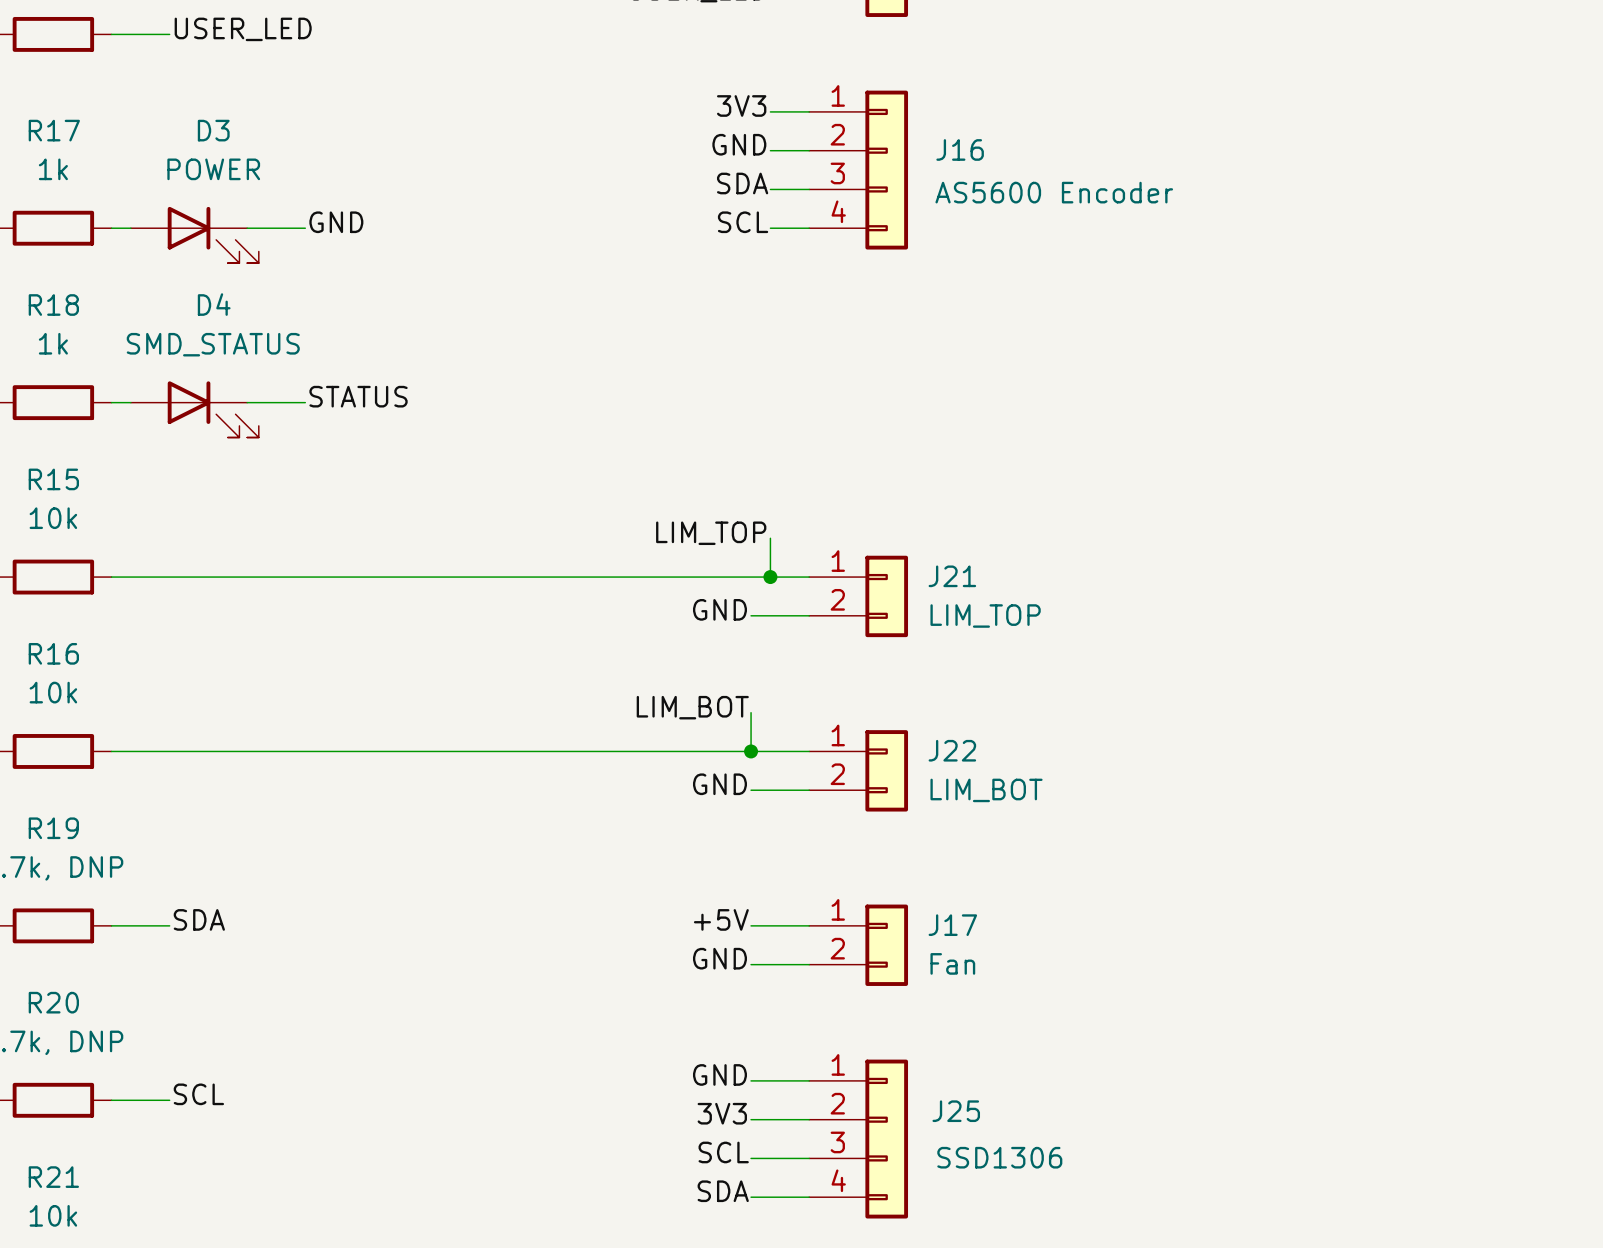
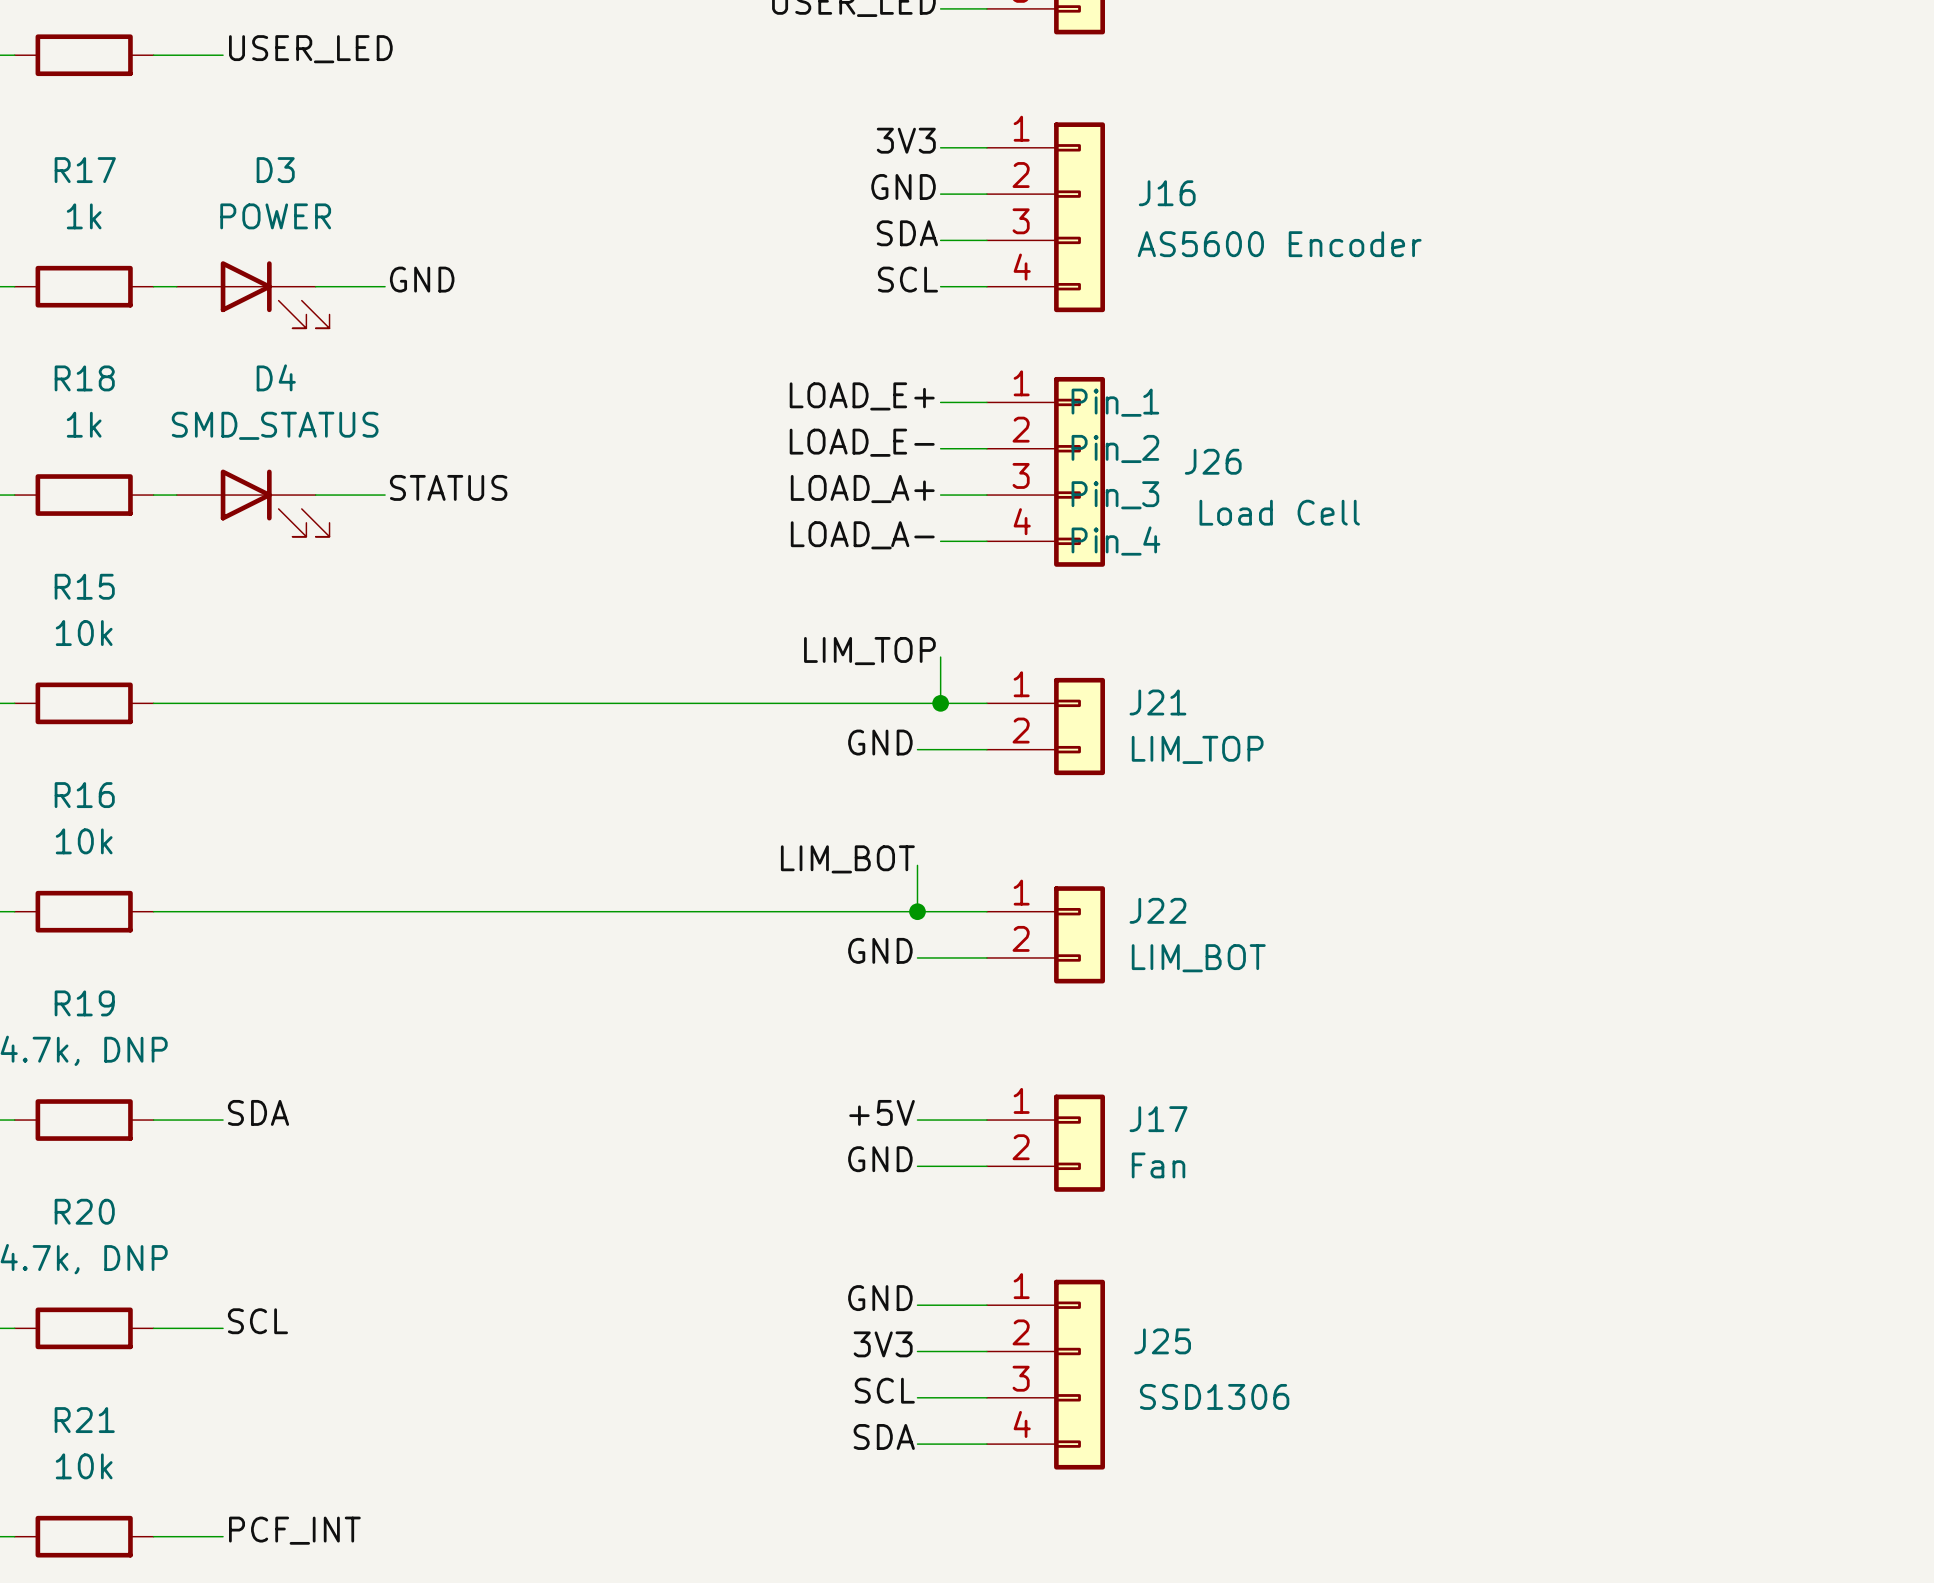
label: none -> LOAD_E+ (862, 396)
wire: none -> (940, 402) (986, 402)
label: none -> LOAD_E- (862, 442)
wire: none -> (940, 448) (986, 448)
J26: none -> Load Cell (1045, 471)
label: none -> LOAD_A+ (862, 489)
wire: none -> (940, 495) (986, 495)
label: none -> LOAD_A- (862, 535)
wire: none -> (940, 541) (986, 541)

